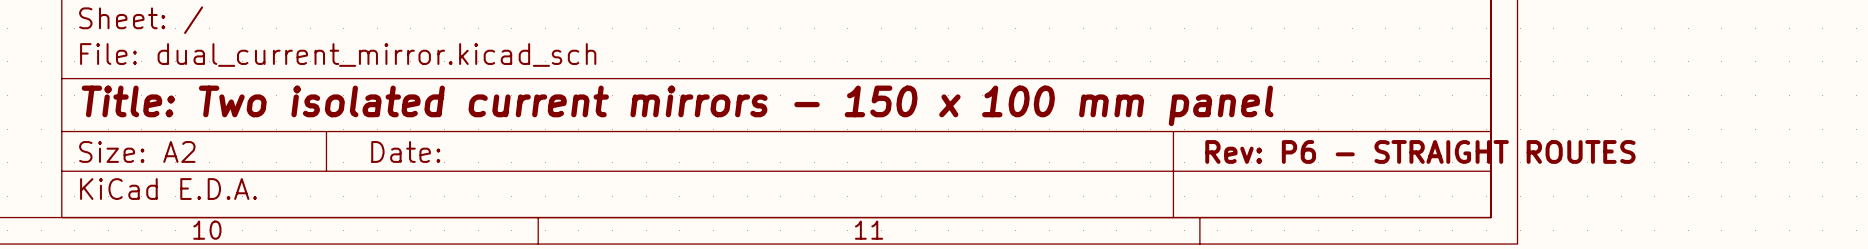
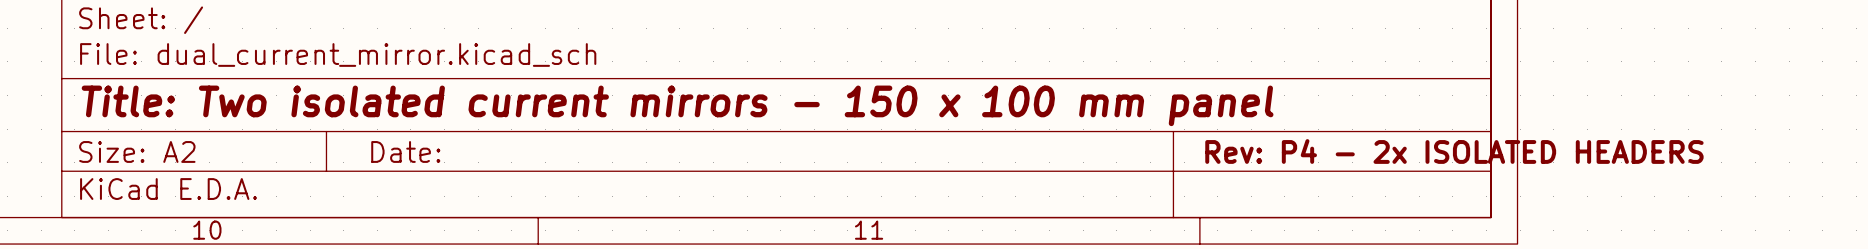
title block: Rev: P6 - STRAIGHT ROUTES (1420, 151) -> Rev: P4 - 2x ISOLATED HEADERS (1454, 151)

